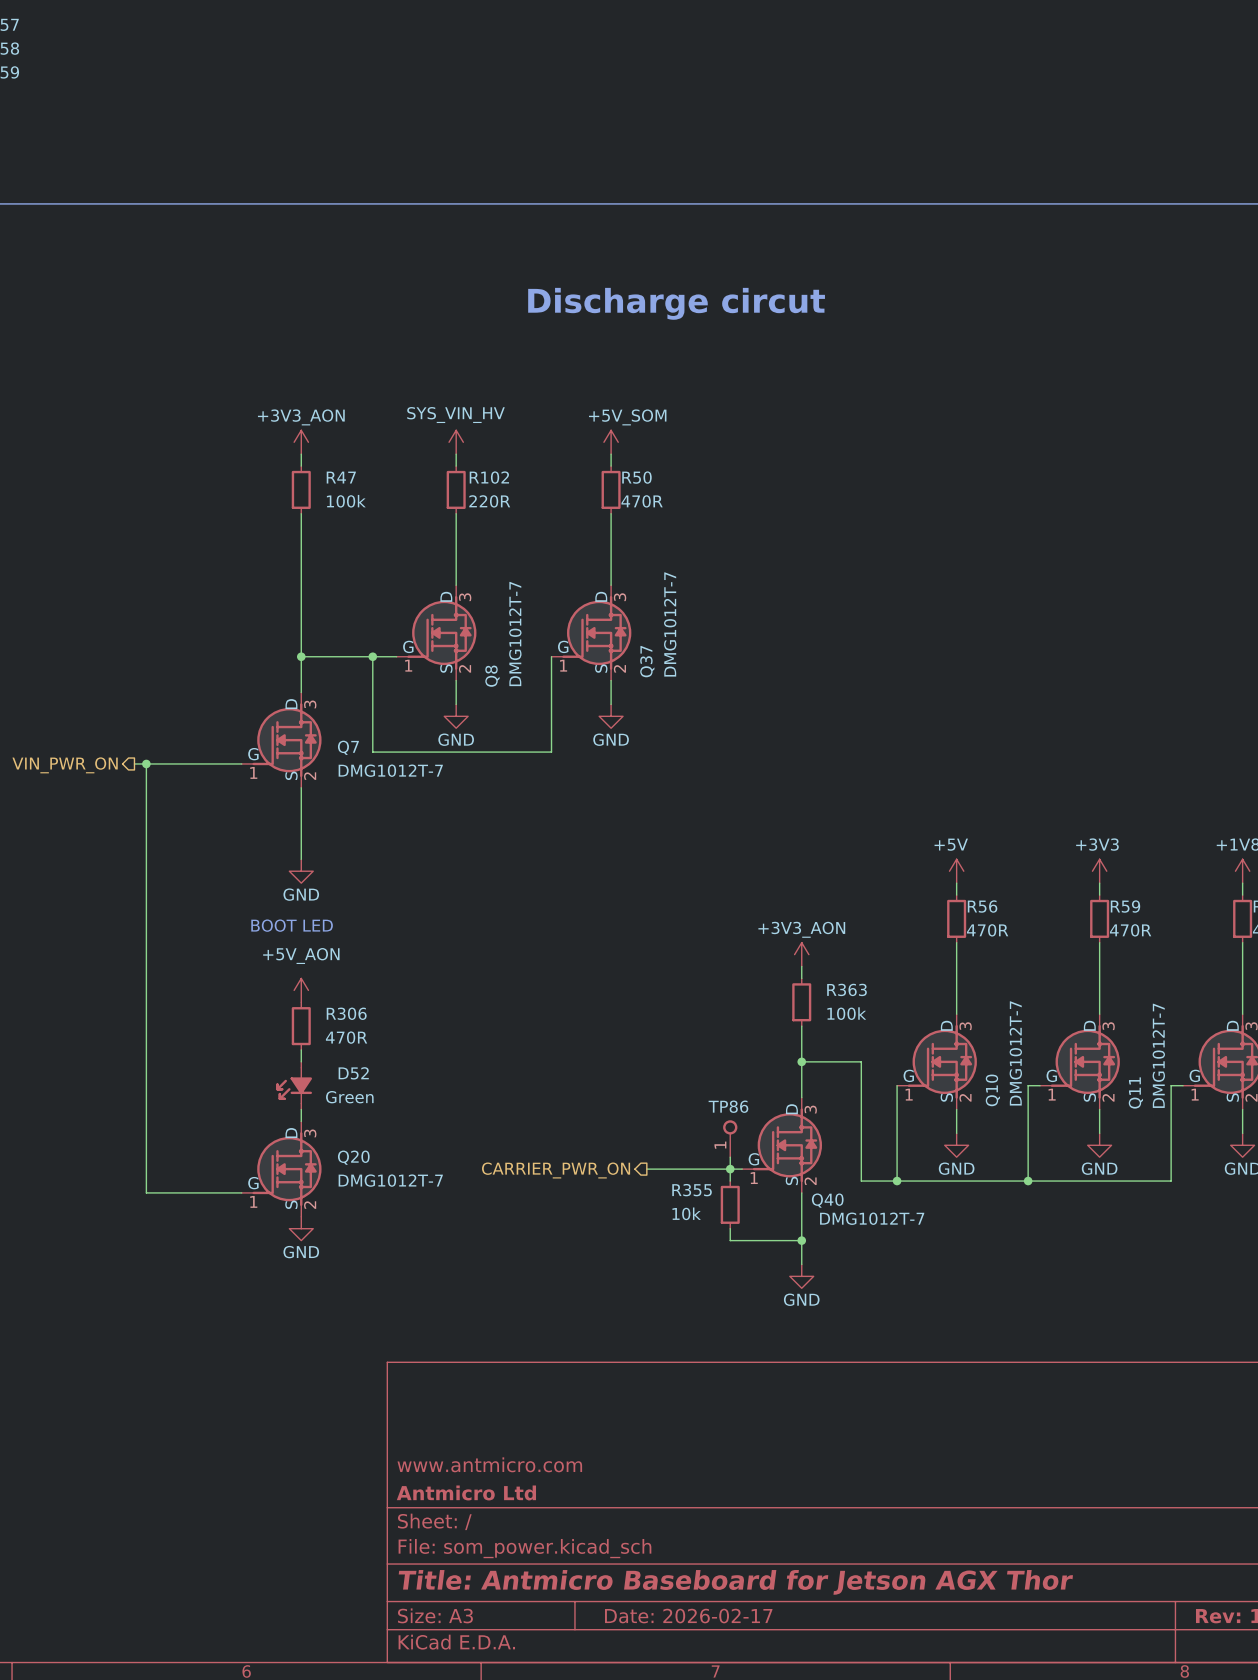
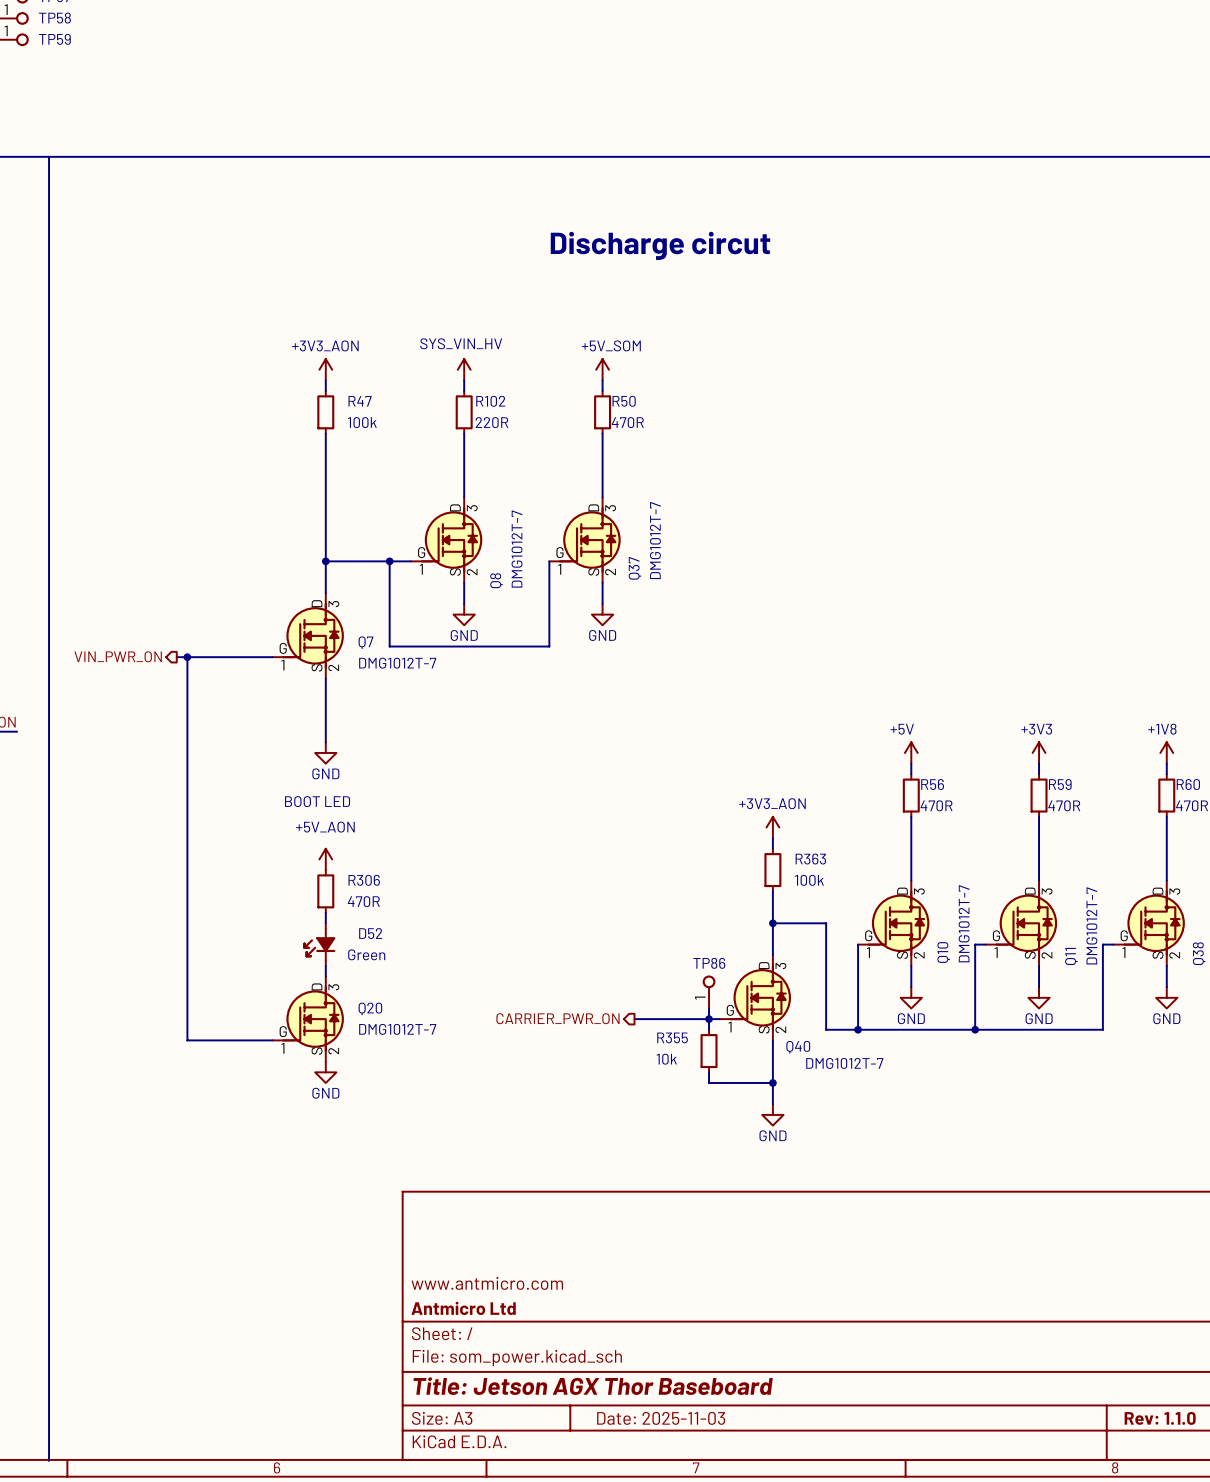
title block: Title: Antmicro Baseboard for Jetson AGX Thor (735, 1582) -> Title: Jetson AGX Thor Baseboard (593, 1386)
title block: Date: 2026-02-17 (688, 1616) -> Date: 2025-11-03 (661, 1418)

